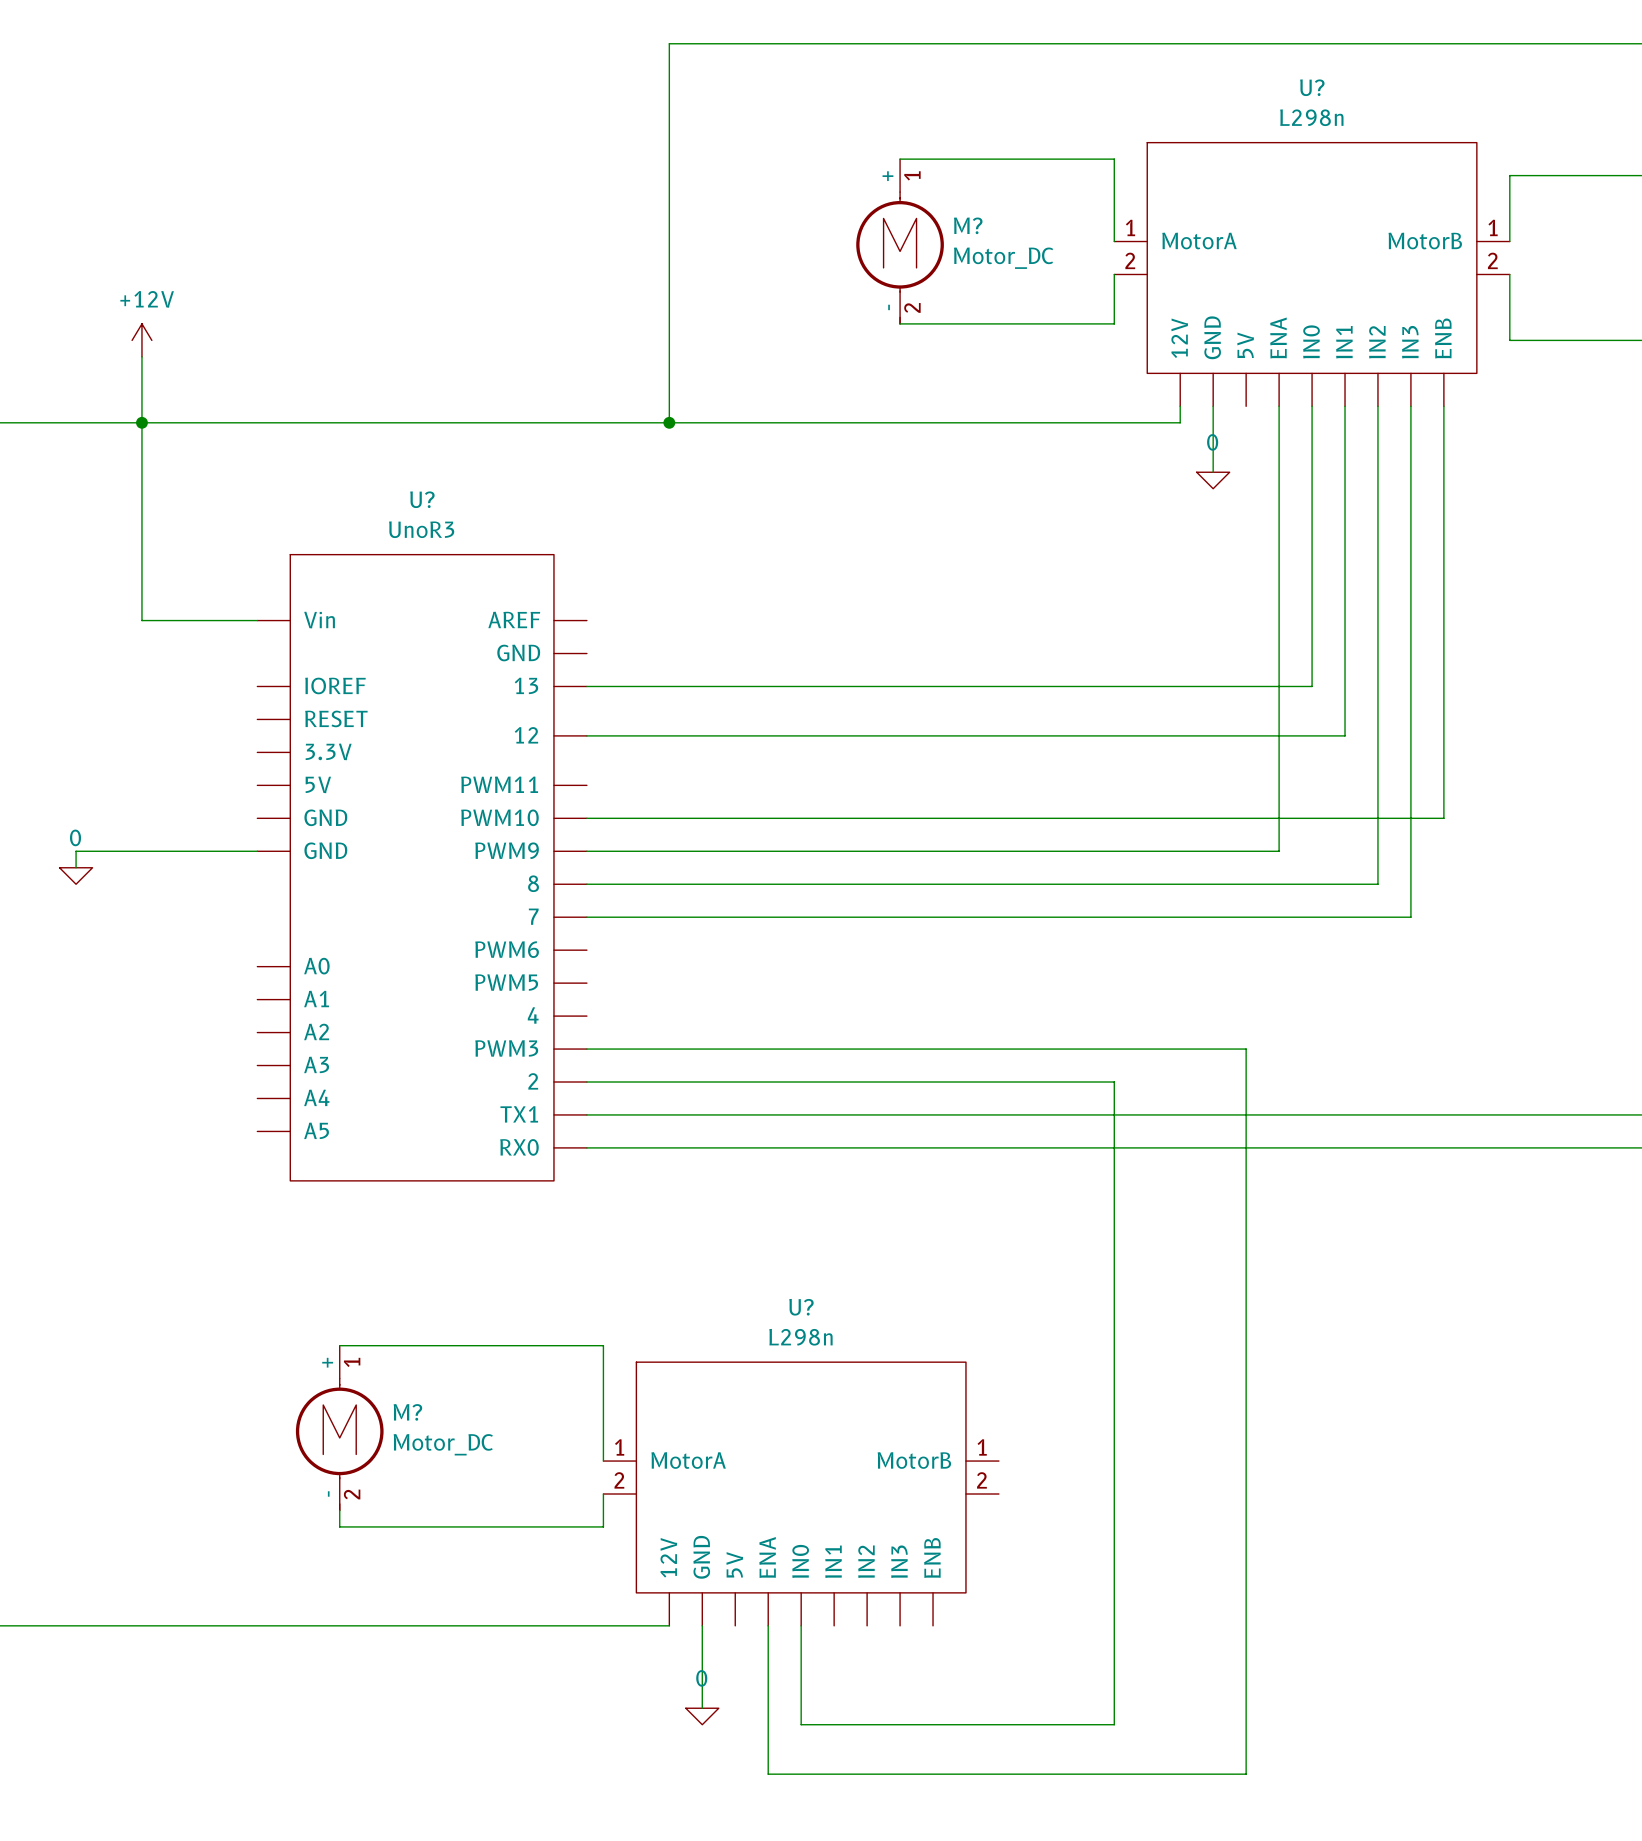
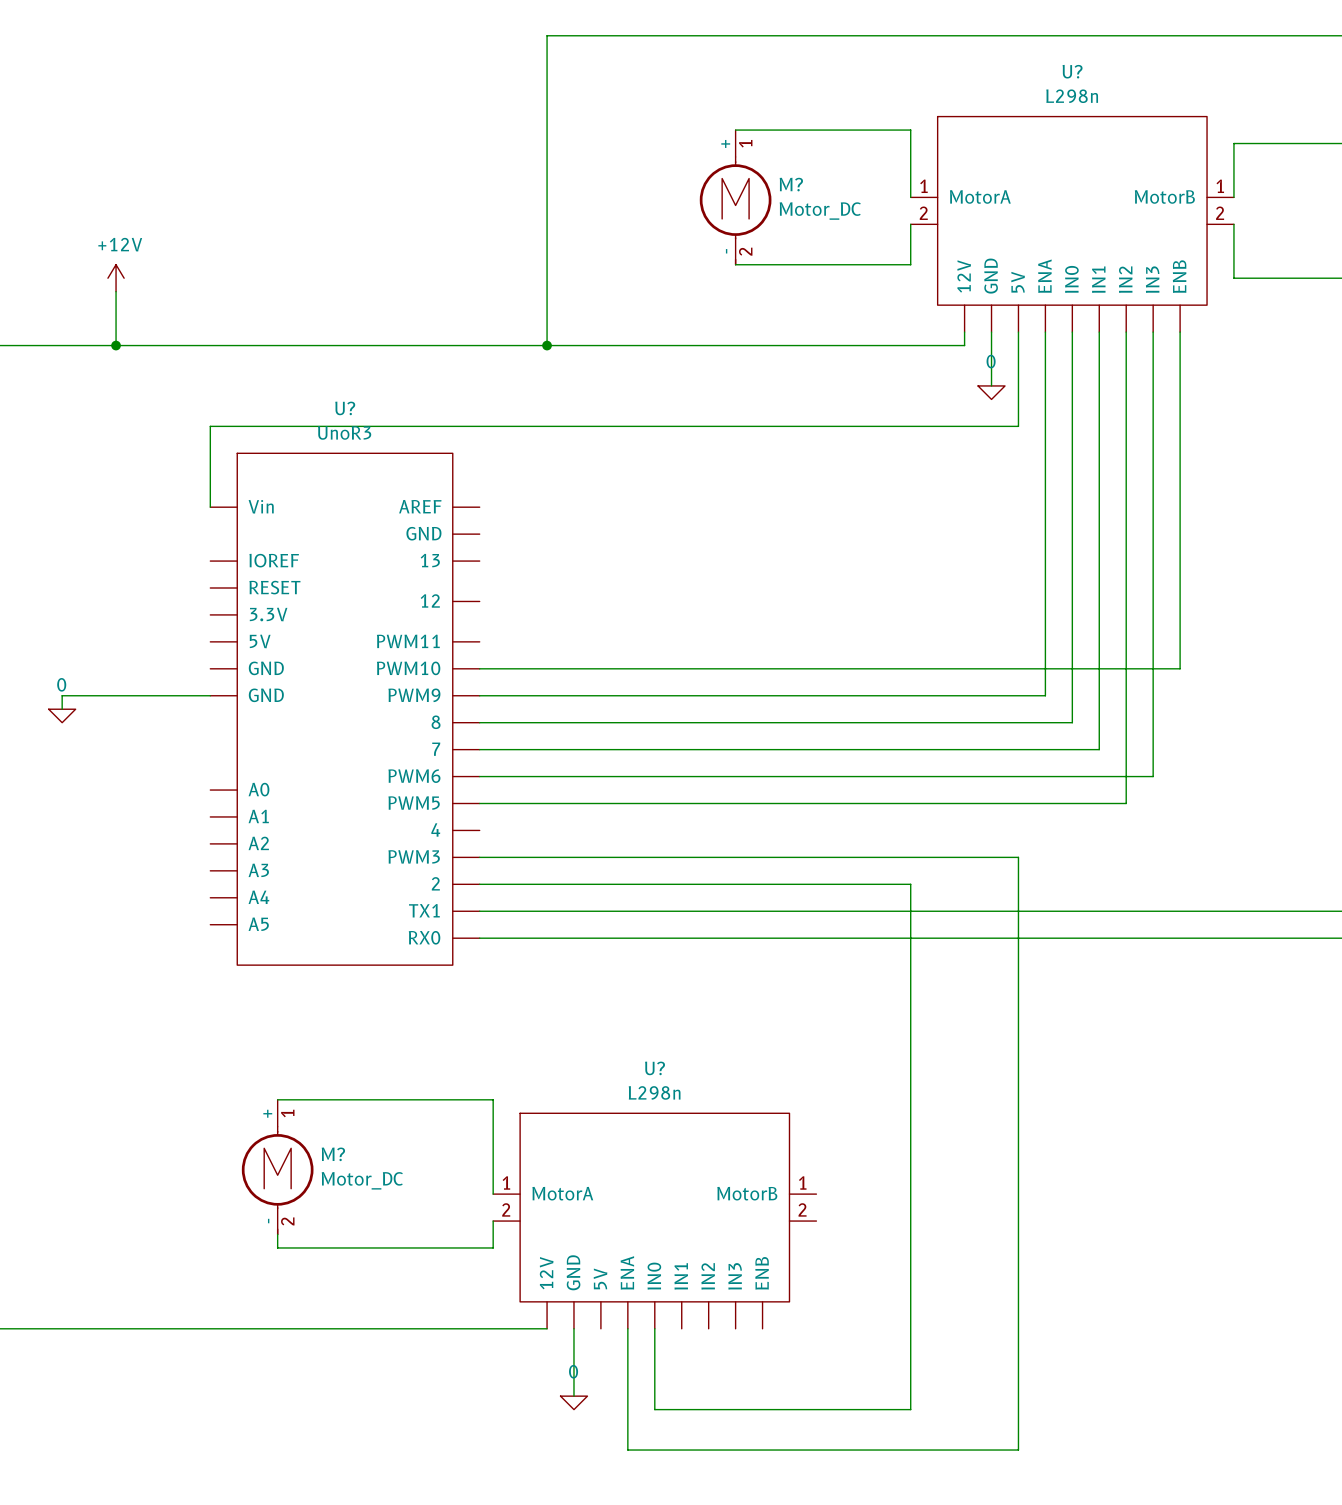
wire: (141, 422) (141, 620) (257, 620) -> (1018, 332) (1018, 426) (210, 426) (210, 507)
wire: (586, 686) (1312, 686) -> none
wire: (586, 735) (1345, 735) -> none
wire: (1312, 884) (1377, 884) -> (1072, 722) (1072, 561)
wire: none -> (1126, 722) (1126, 803) (479, 803)
wire: (1345, 917) (1410, 917) -> (1099, 749) (1099, 601)
wire: none -> (1153, 749) (1153, 776) (479, 776)

